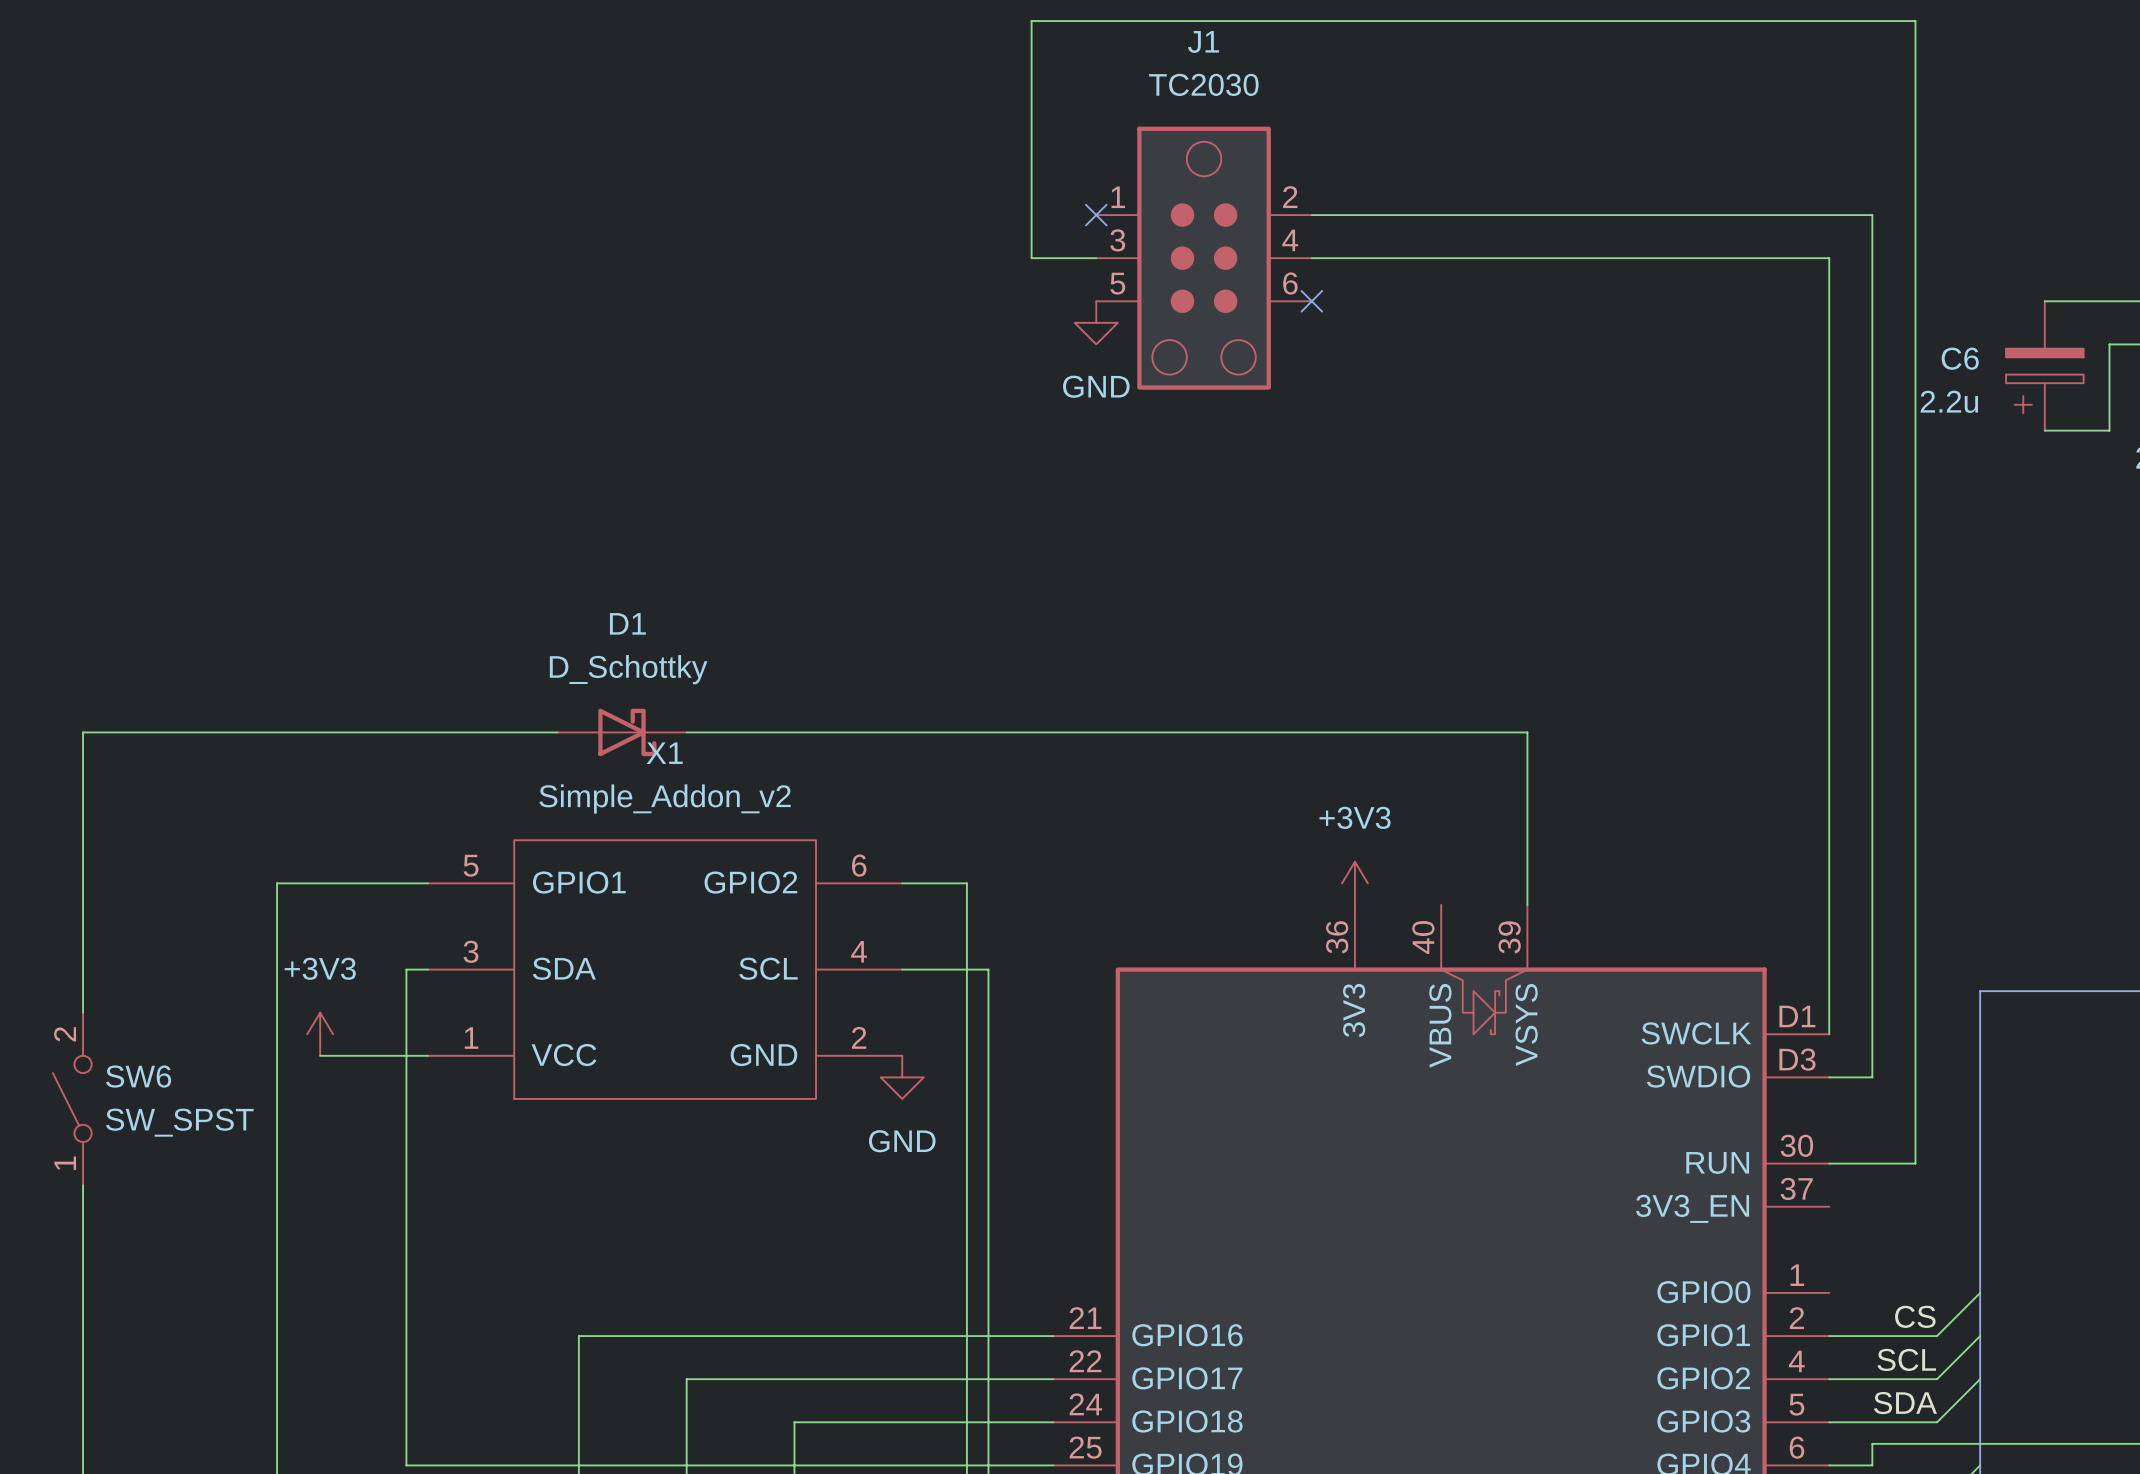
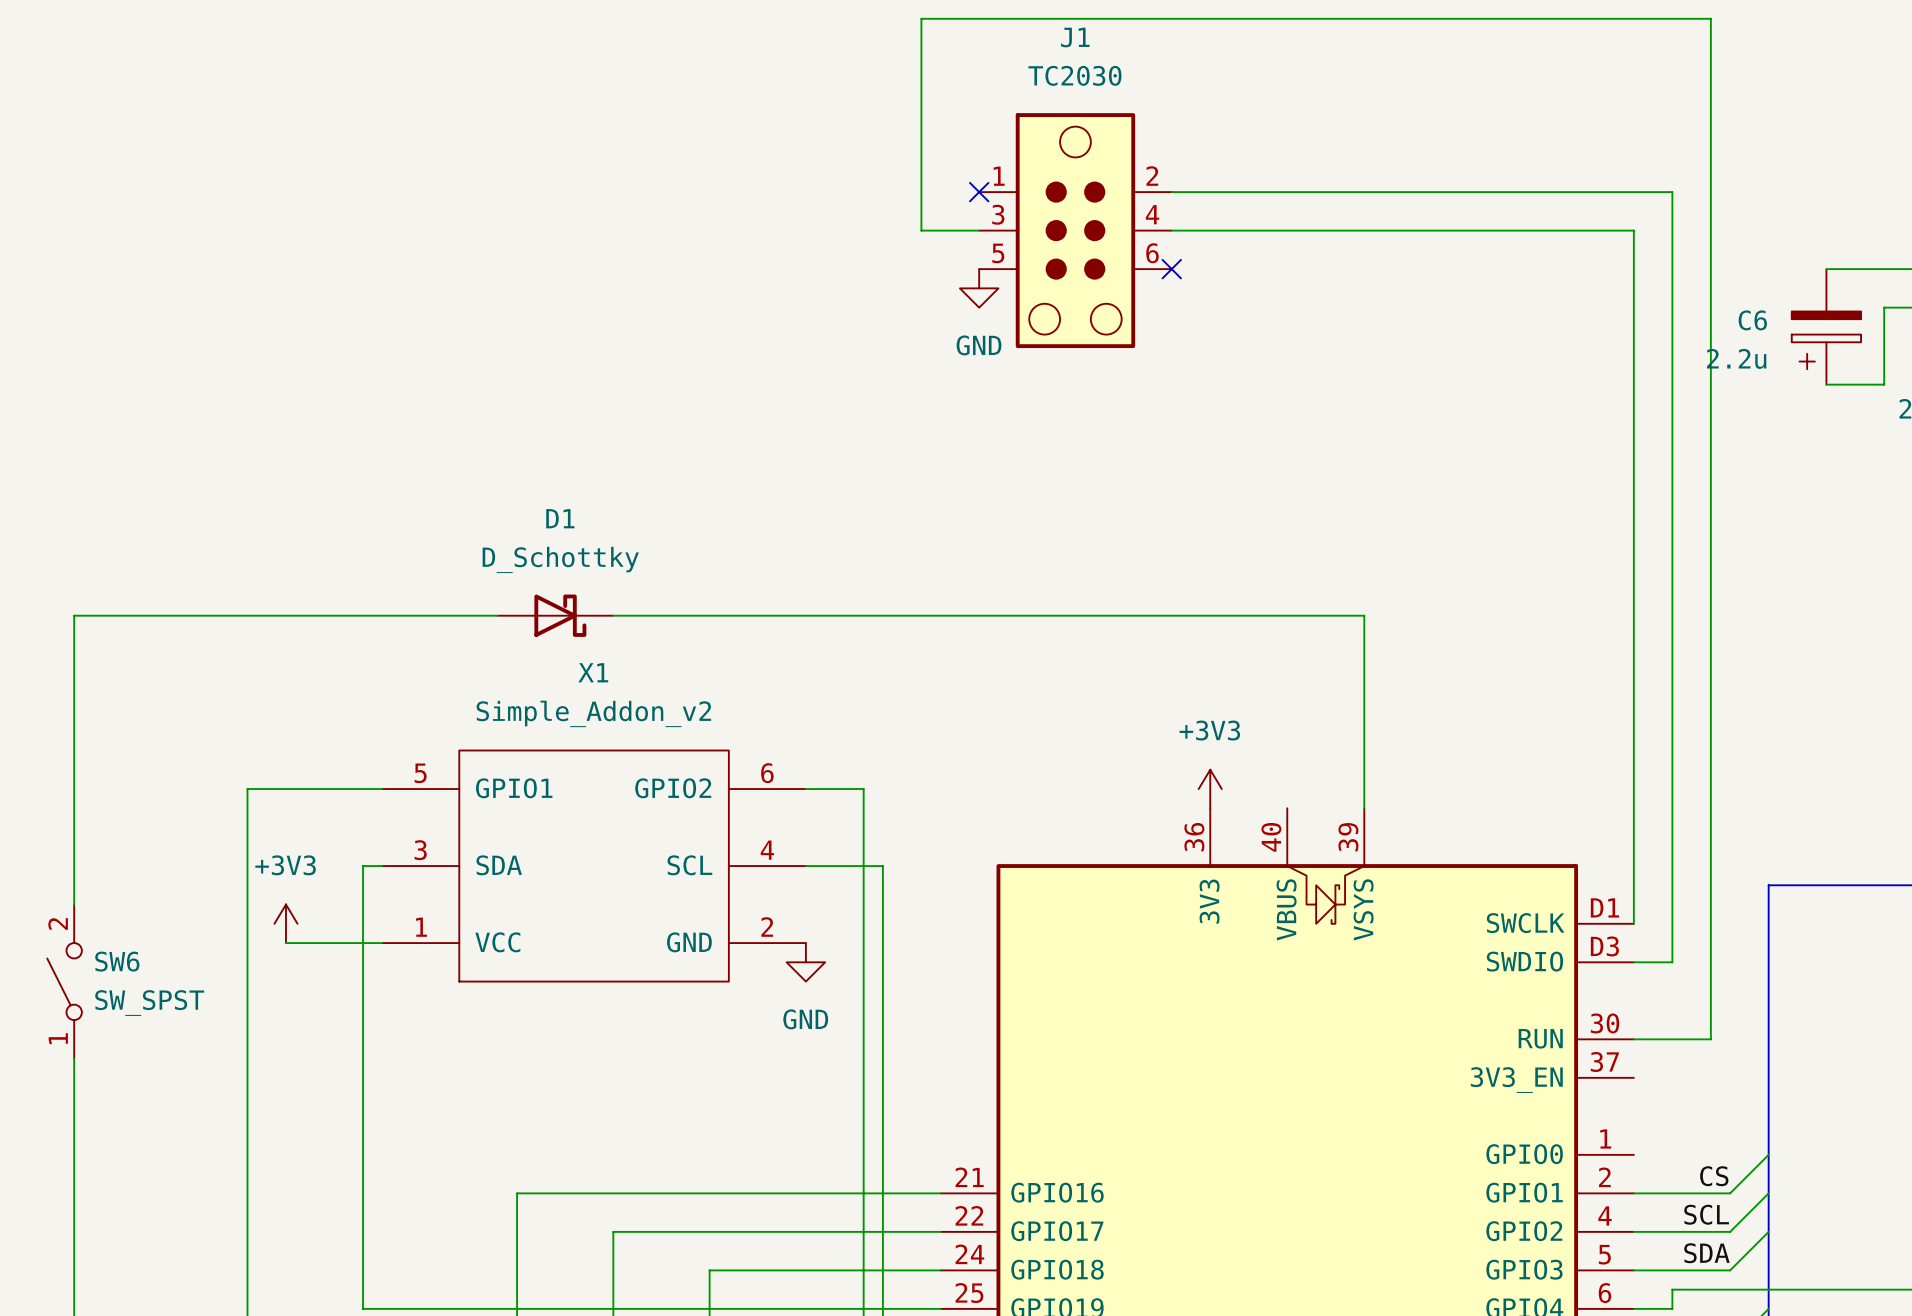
wire: (83, 732) (557, 732) -> (74, 654) (74, 615) (497, 615)
D1 position: (621, 732) -> (555, 615)
wire: (686, 732) (1527, 732) -> (613, 615) (1364, 615) (1364, 654)

